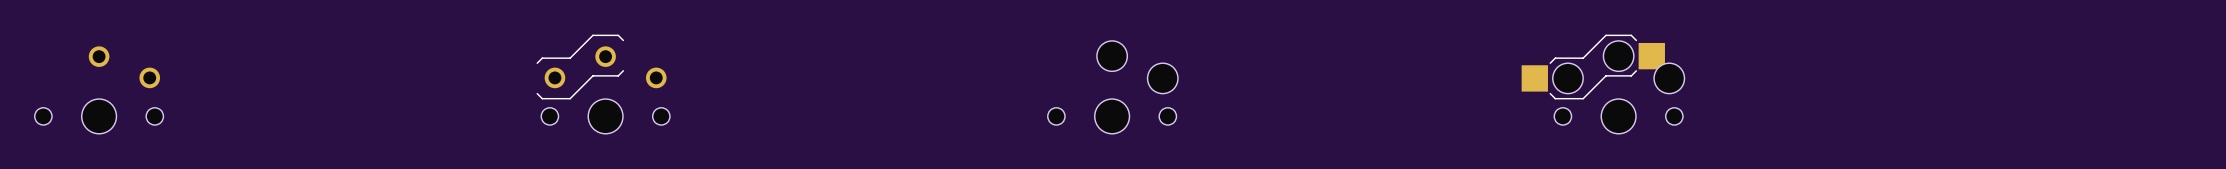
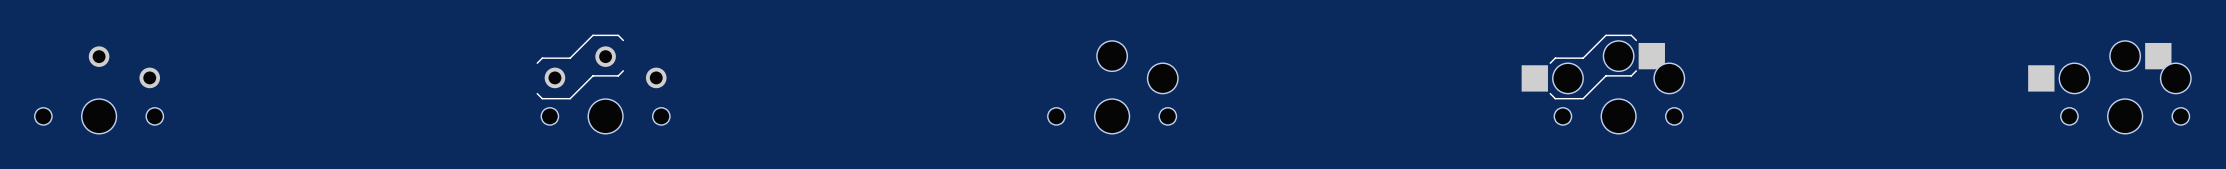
part: none -> (2109, 87)

